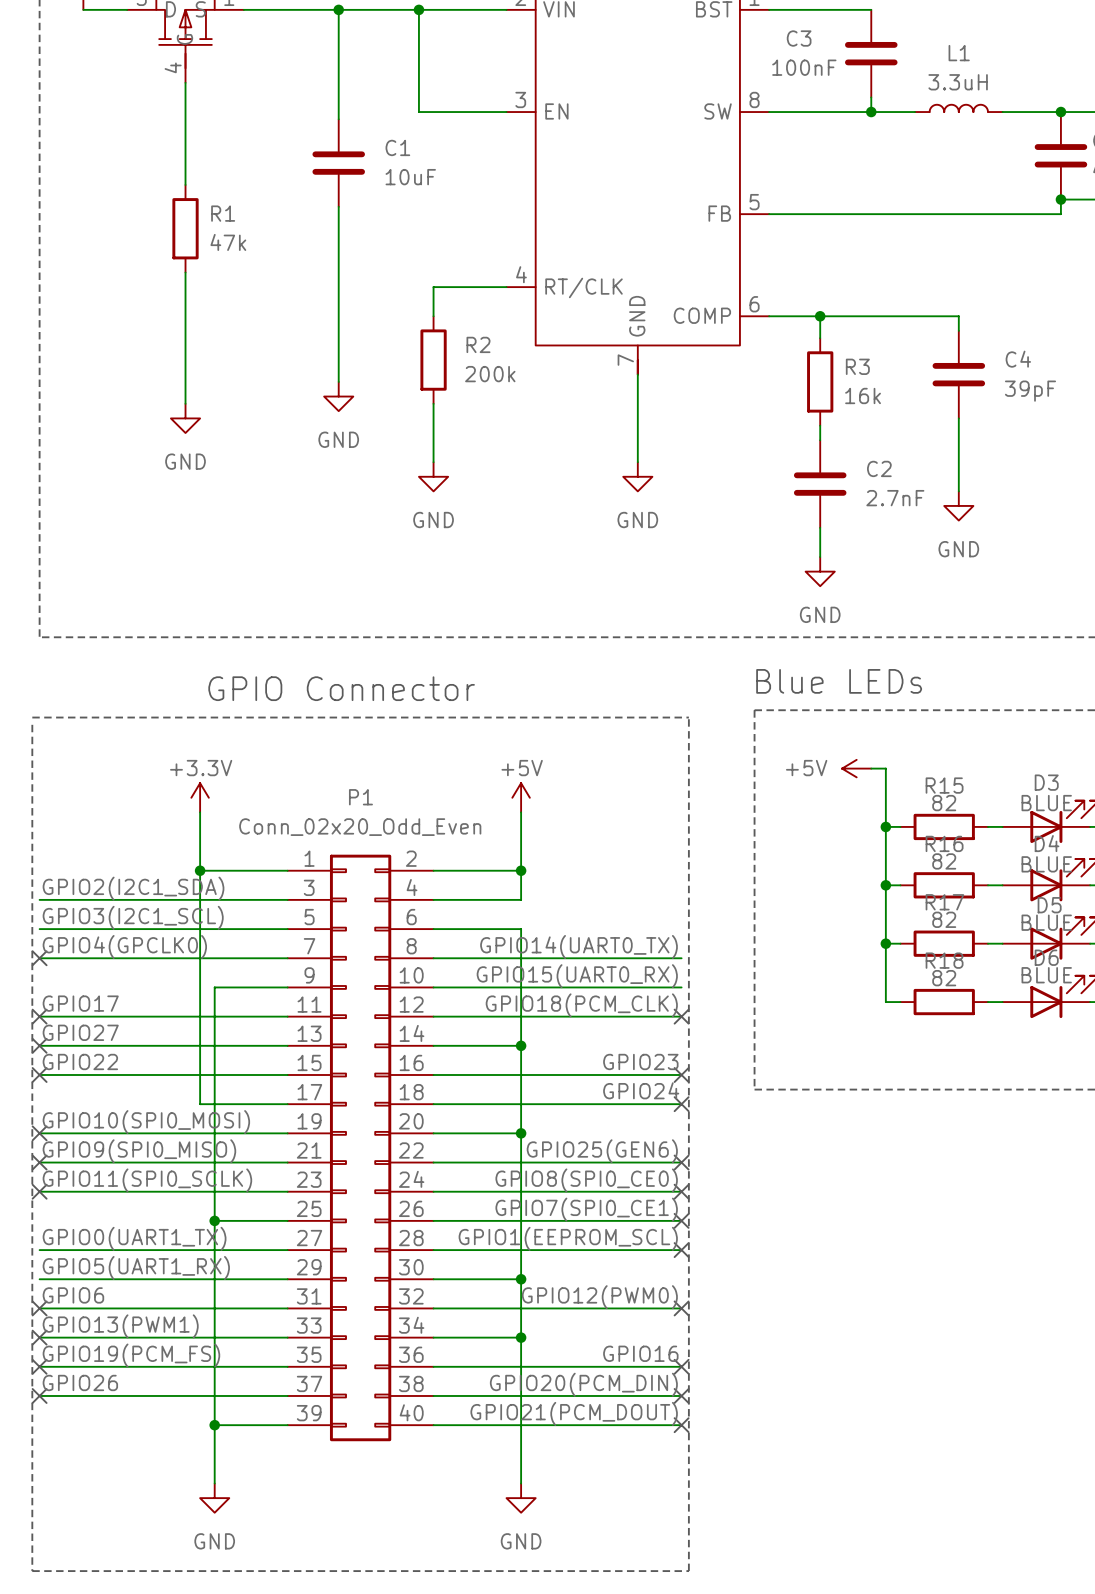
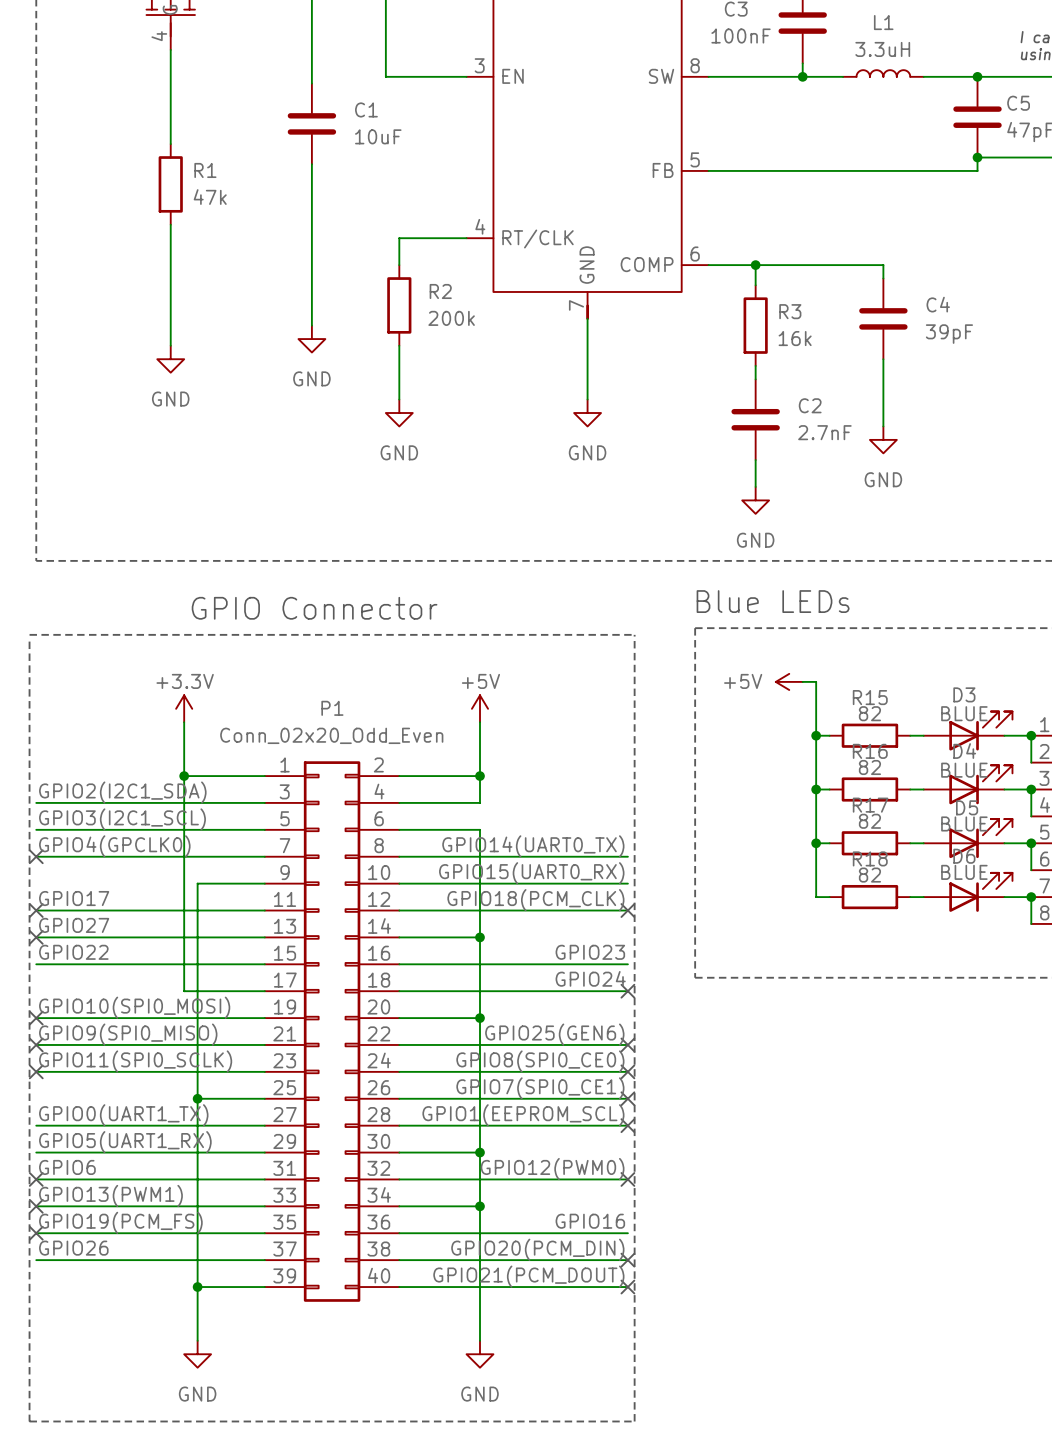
no-connect mark: (39, 1075) -> none
no-connect mark: (681, 1075) -> none
no-connect mark: (681, 1366) -> none
no-connect mark: (39, 1395) -> none

